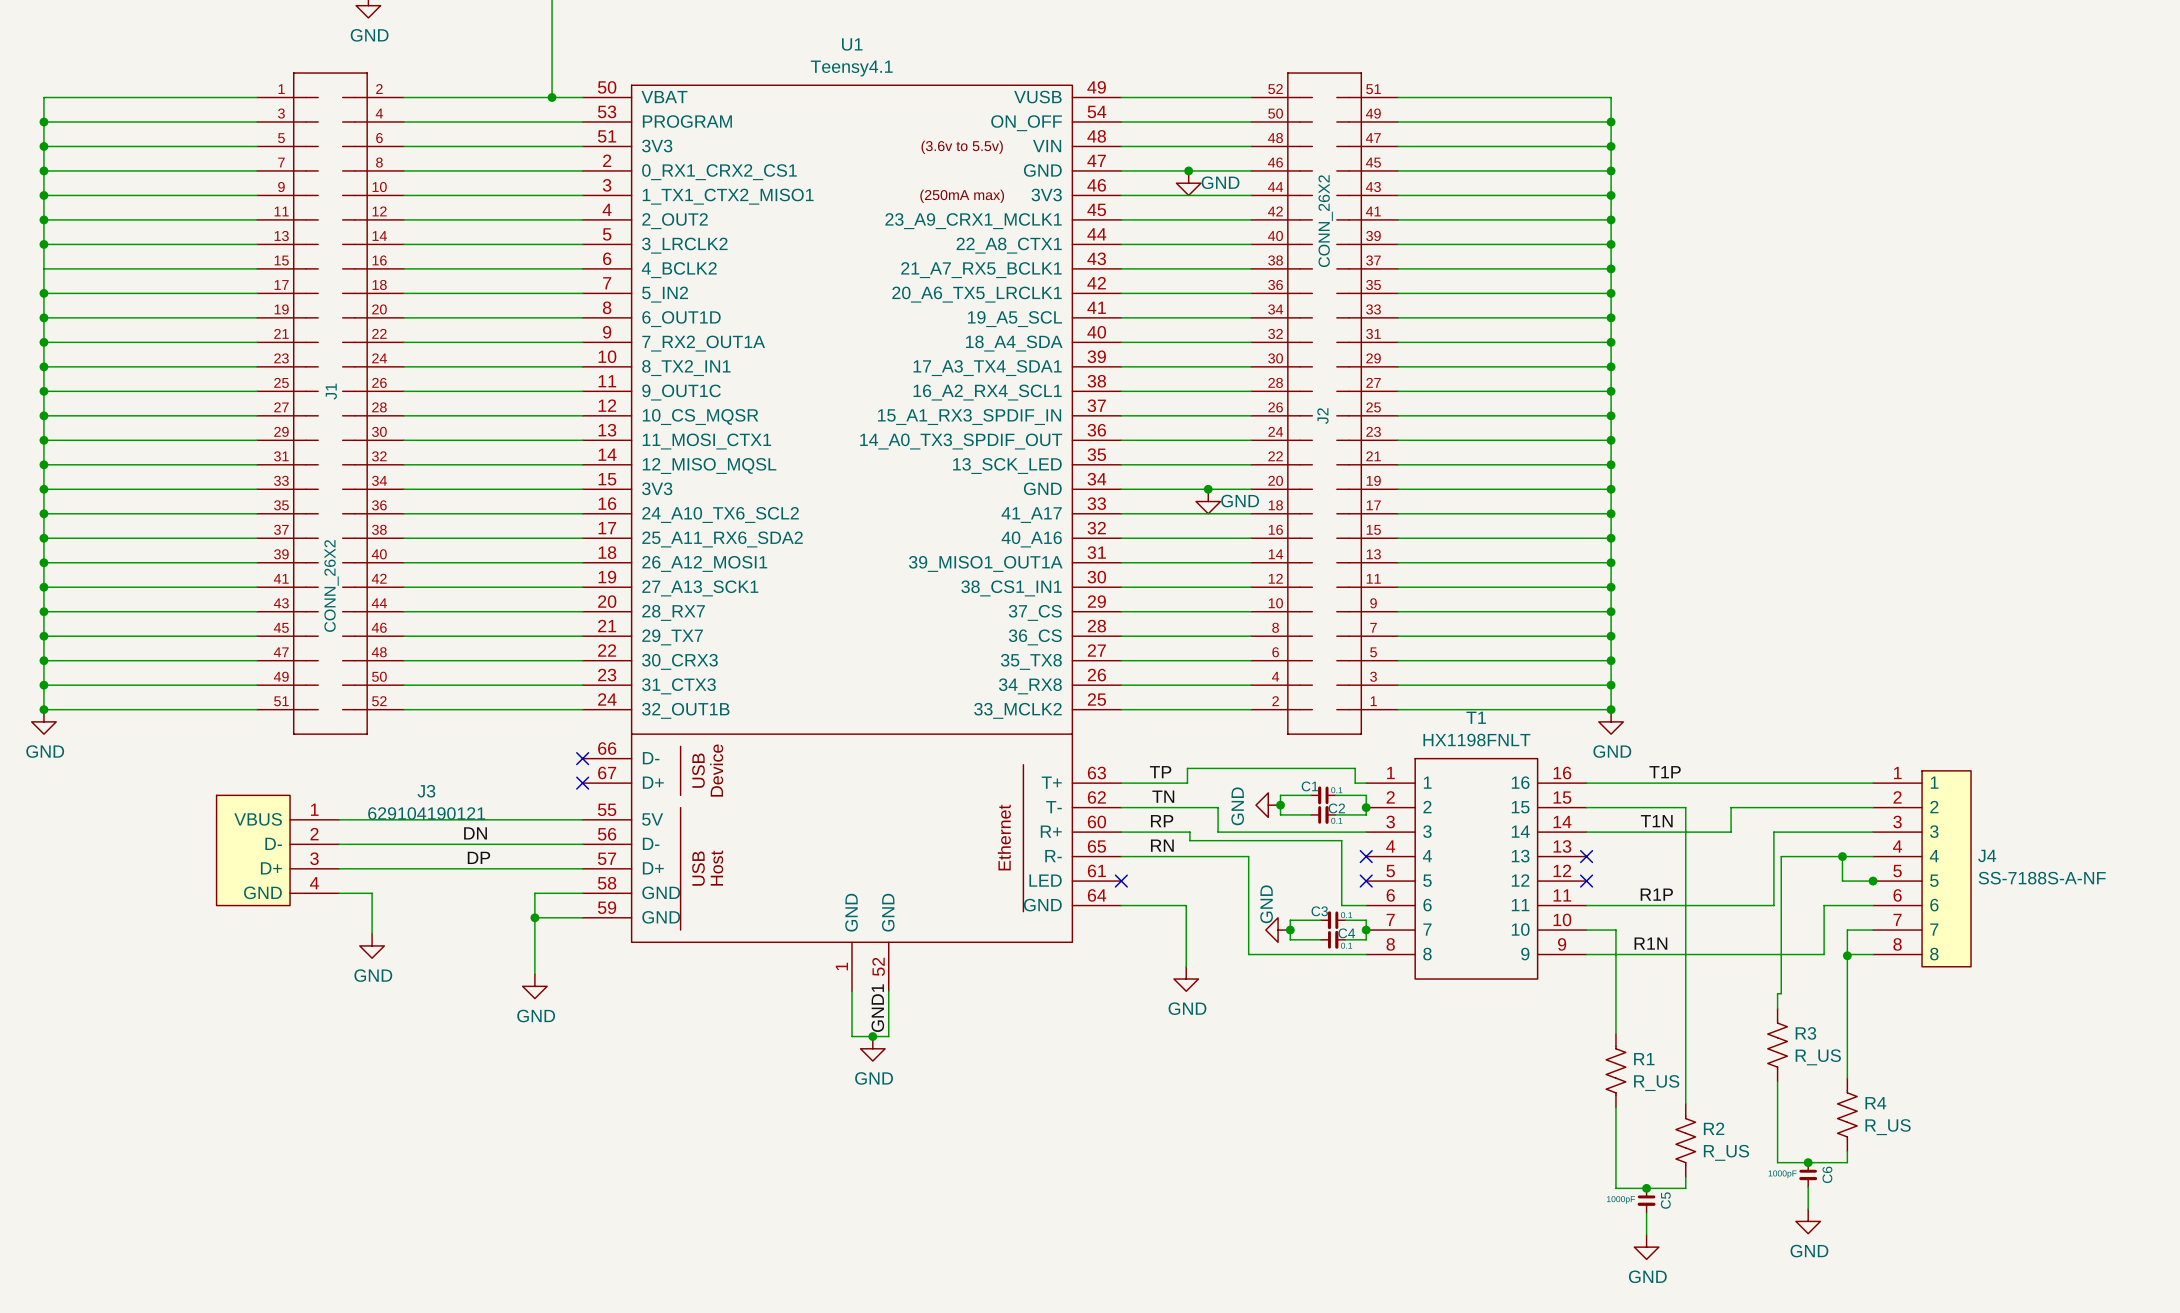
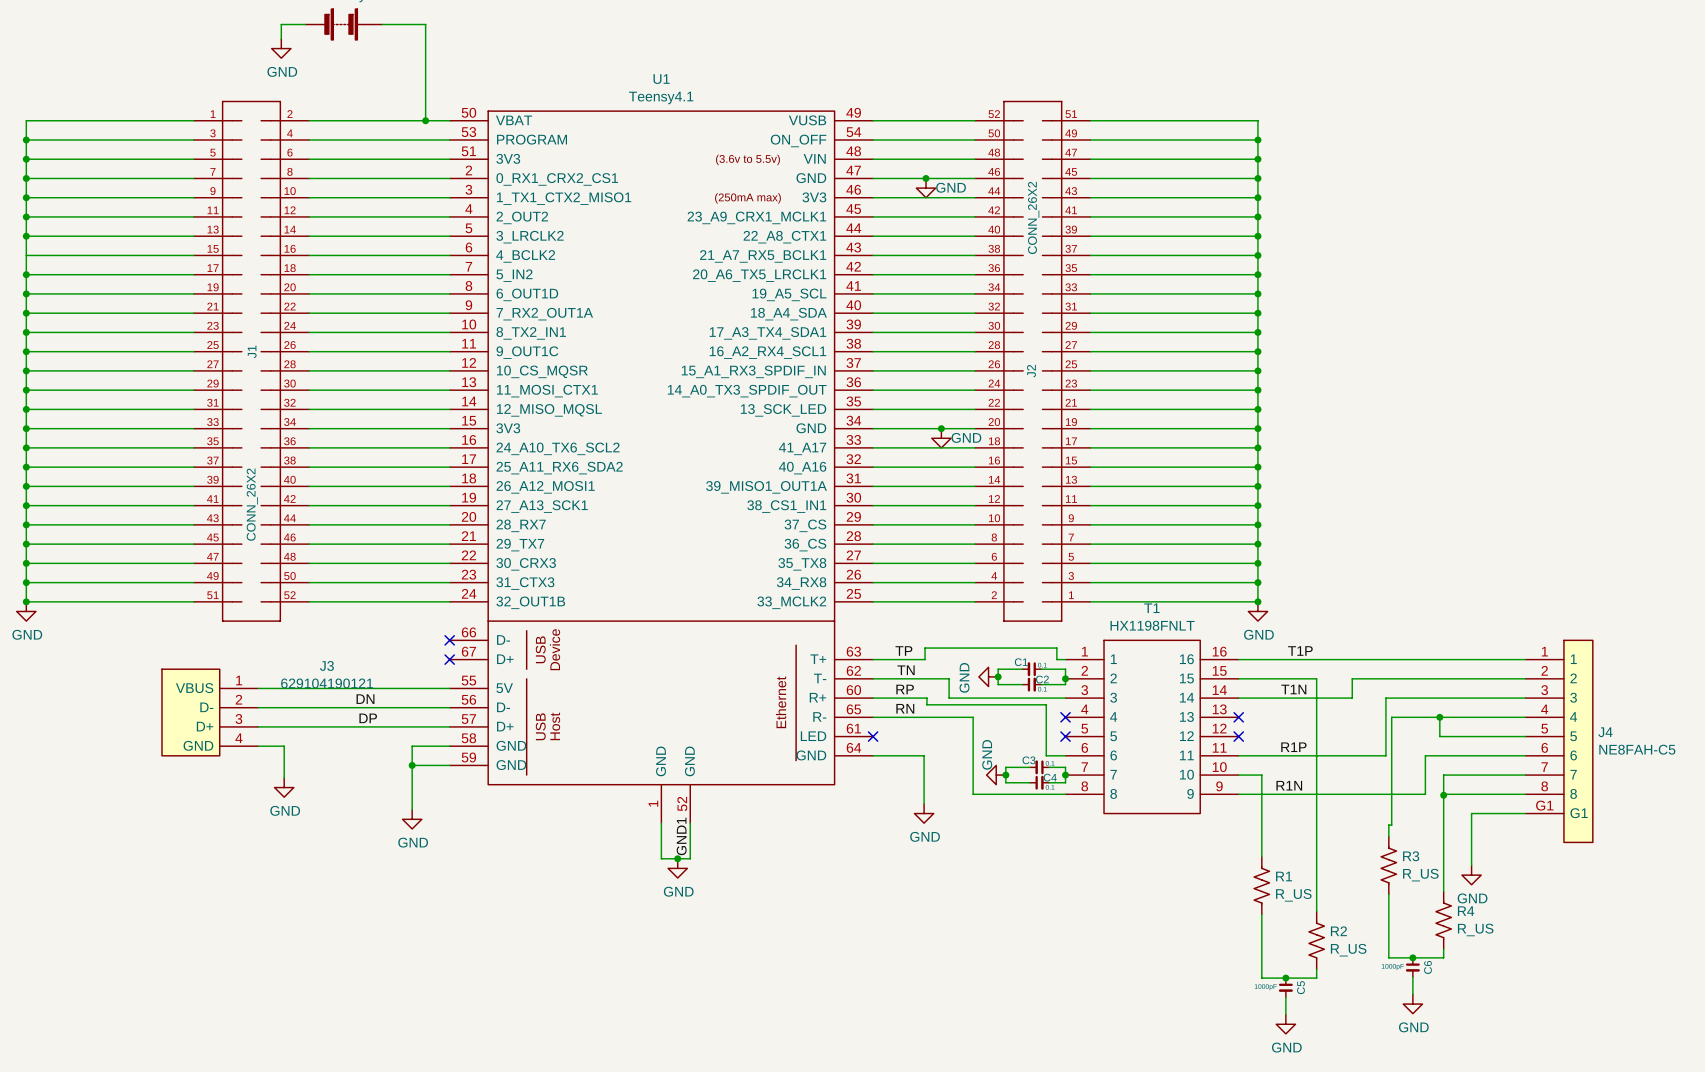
J4 symbol: [1873, 770, 1972, 967] -> [1525, 640, 1593, 843]
J4 value: SS-7188S-A-NF (2042, 878) -> NE8FAH-C5 (1637, 749)
junction: (1873, 881) -> none
wire: none -> (1525, 813) (1471, 813) (1471, 865)
power symbol: none -> GND (1471, 875)

